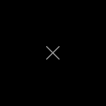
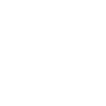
no-connect mark: (52, 52) -> none

